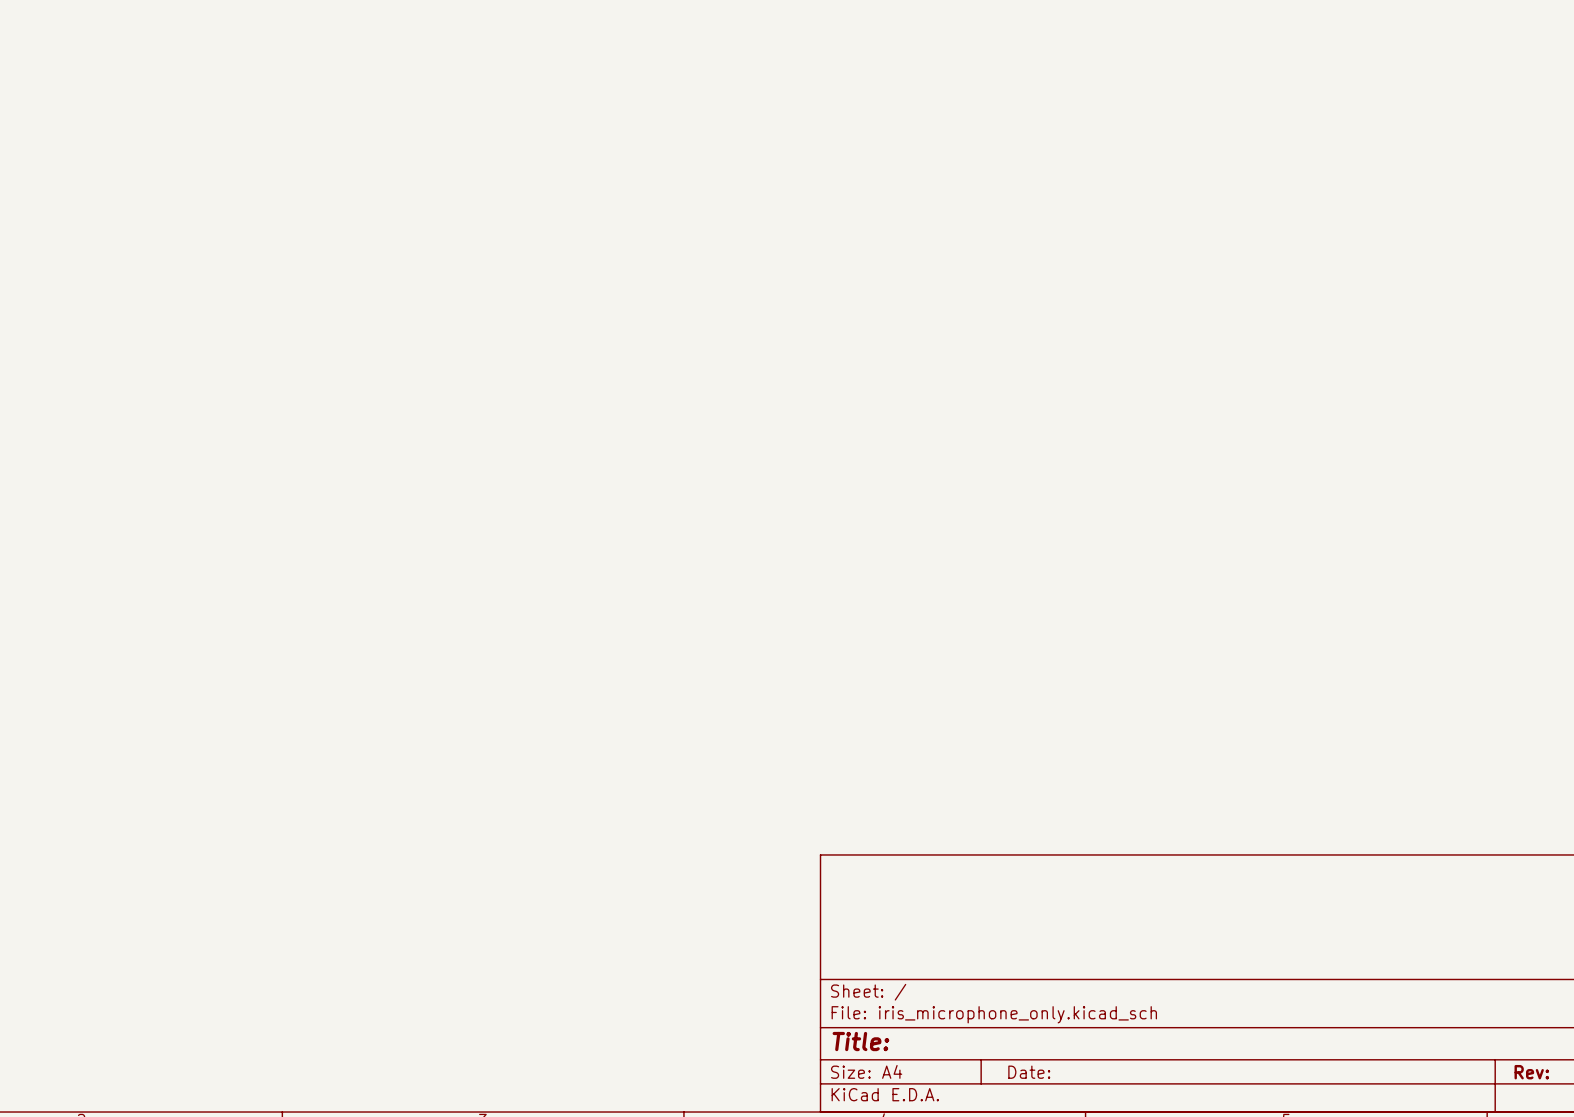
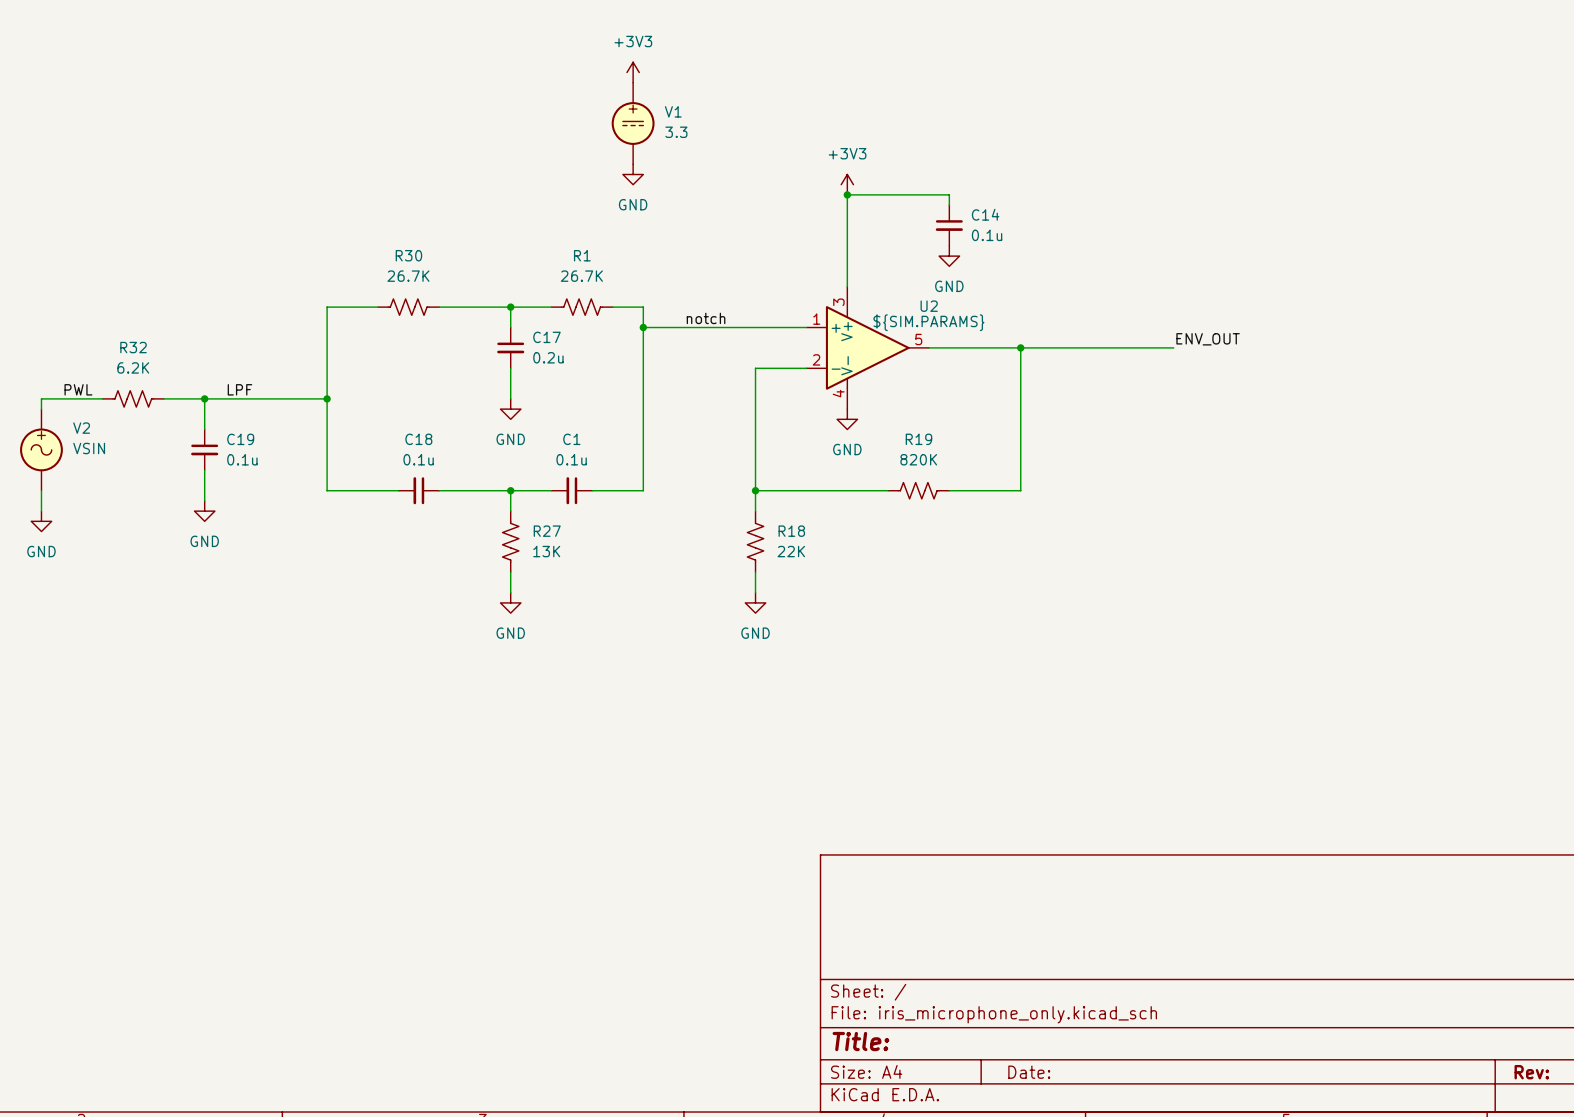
power symbol: none -> +3V3 (633, 72)
V1: none -> 3.3 (633, 123)
power symbol: none -> GND (633, 174)
power symbol: none -> +3V3 (847, 184)
junction: none -> (847, 194)
wire: none -> (949, 205) (949, 194) (847, 194) (847, 286)
C14: none -> 0.1u (949, 225)
power symbol: none -> GND (949, 256)
wire: none -> (378, 307) (327, 307) (327, 490) (398, 490)
R30: none -> 26.7K (408, 307)
wire: none -> (439, 307) (551, 307)
wire: none -> (510, 307) (510, 327)
junction: none -> (510, 307)
R1: none -> 26.7K (582, 307)
wire: none -> (612, 307) (643, 307) (643, 490) (592, 490)
label: none -> notch (706, 318)
wire: none -> (643, 327) (806, 327)
junction: none -> (643, 327)
label: none -> ENV_OUT (1208, 339)
C17: none -> 0.2u (510, 347)
U2: none -> ${SIM.PARAMS} (867, 347)
wire: none -> (928, 347) (1173, 347)
wire: none -> (1020, 347) (1020, 490) (949, 490)
junction: none -> (1020, 347)
wire: none -> (510, 368) (510, 398)
wire: none -> (806, 368) (755, 368) (755, 511)
label: none -> PWL (78, 389)
label: none -> LPF (239, 389)
wire: none -> (102, 398) (41, 398) (41, 409)
R32: none -> 6.2K (133, 398)
wire: none -> (163, 398) (327, 398)
wire: none -> (204, 398) (204, 429)
junction: none -> (204, 398)
junction: none -> (327, 398)
power symbol: none -> GND (510, 409)
power symbol: none -> GND (847, 419)
V2: none -> VSIN (41, 449)
C19: none -> 0.1u (204, 449)
wire: none -> (204, 470) (204, 500)
wire: none -> (41, 490) (41, 511)
C18: none -> 0.1u (418, 490)
wire: none -> (439, 490) (551, 490)
wire: none -> (510, 490) (510, 511)
junction: none -> (510, 490)
C1: none -> 0.1u (571, 490)
wire: none -> (755, 490) (888, 490)
junction: none -> (755, 490)
R19: none -> 820K (918, 490)
power symbol: none -> GND (204, 511)
power symbol: none -> GND (41, 521)
R27: none -> 13K (510, 541)
R18: none -> 22K (755, 541)
wire: none -> (510, 572) (510, 592)
wire: none -> (755, 572) (755, 592)
power symbol: none -> GND (510, 602)
power symbol: none -> GND (755, 602)

